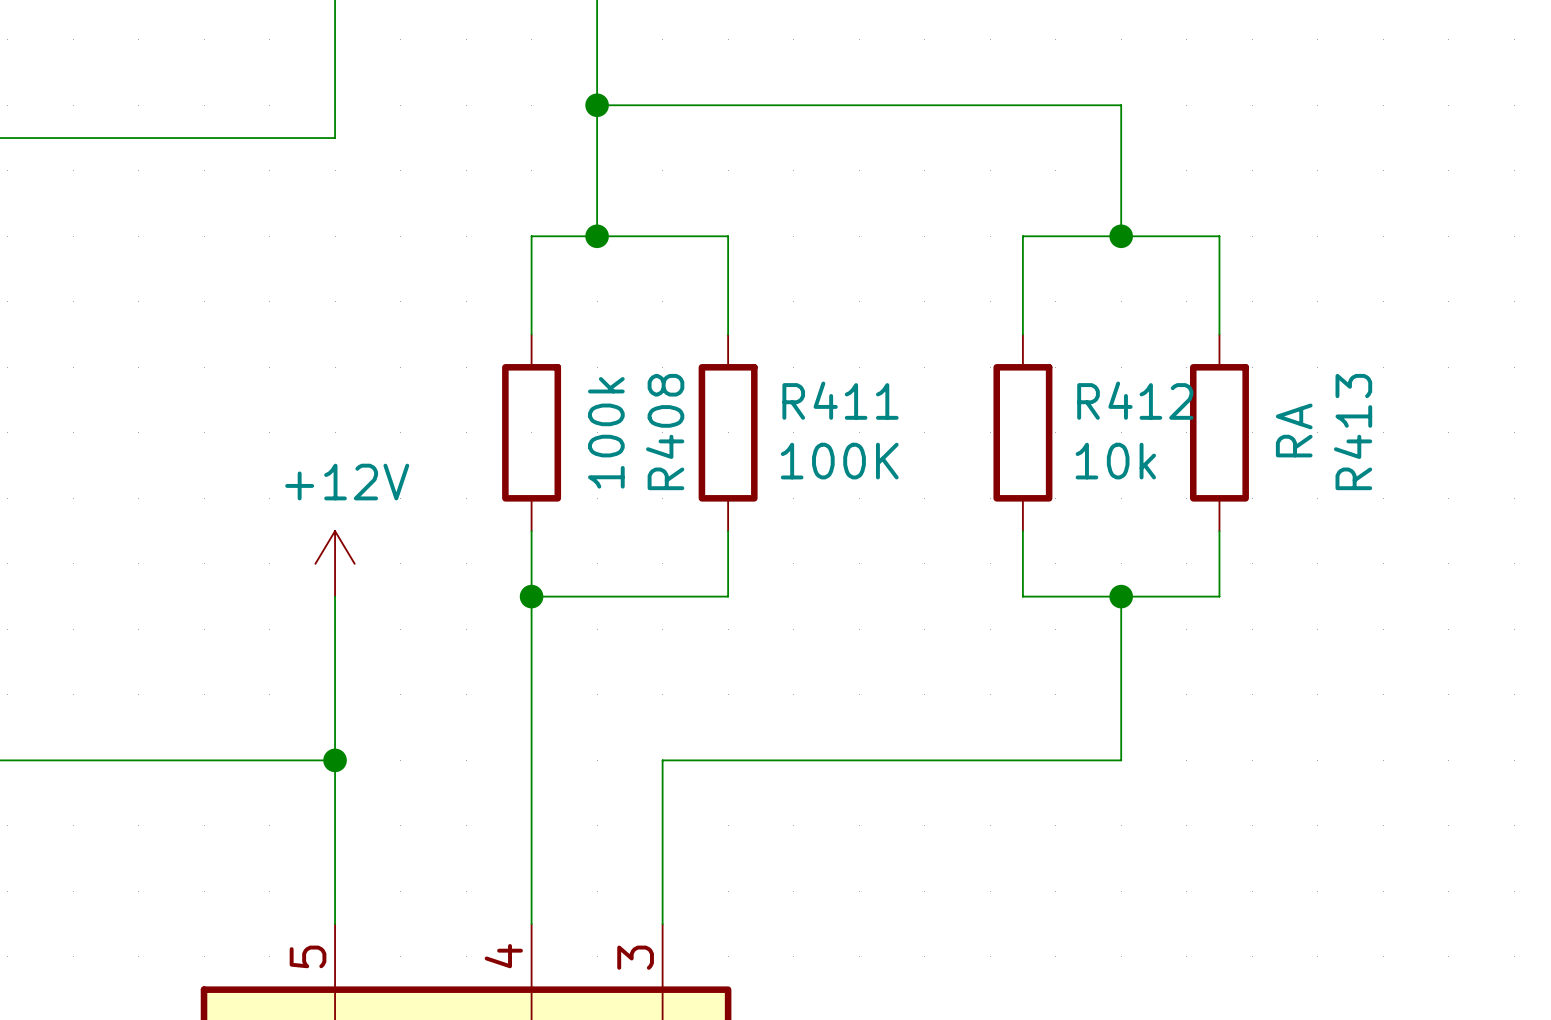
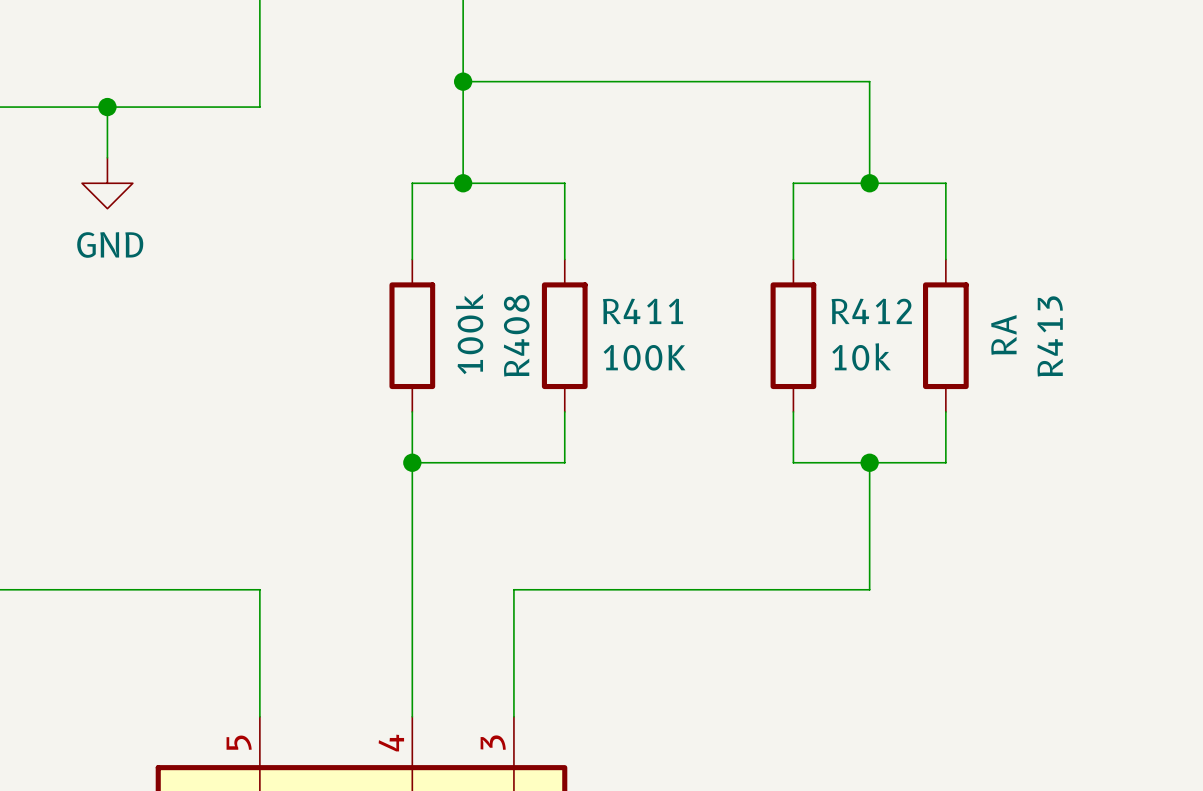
wire: none -> (107, 107) (107, 157)
junction: none -> (107, 107)
power symbol: none -> GND (107, 183)
power symbol: +12V (335, 563) -> none
wire: (335, 596) (335, 760) -> none
junction: (335, 760) -> none

